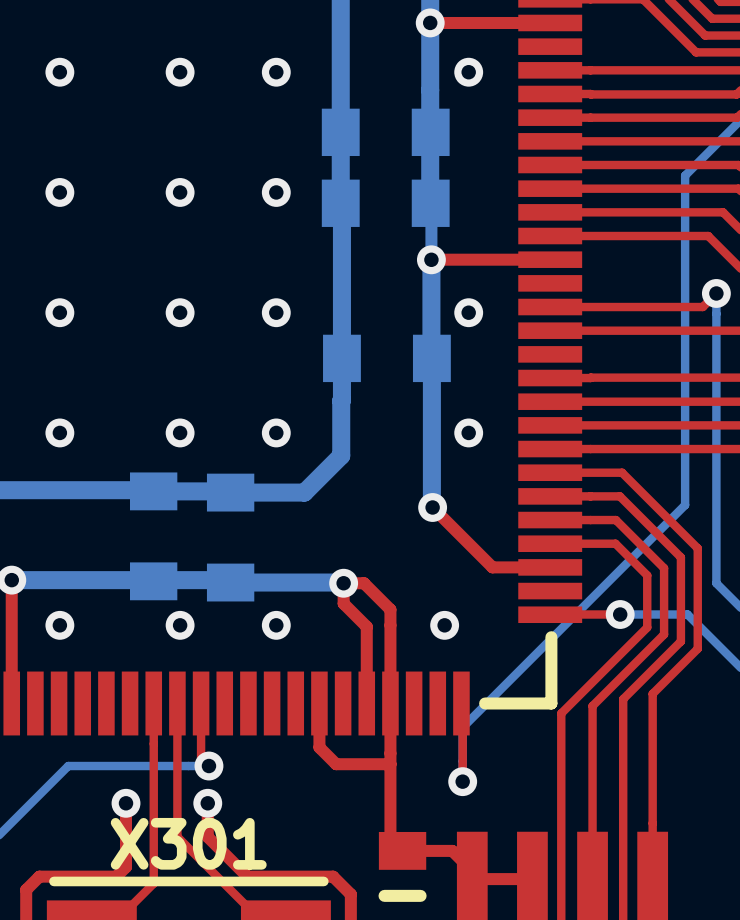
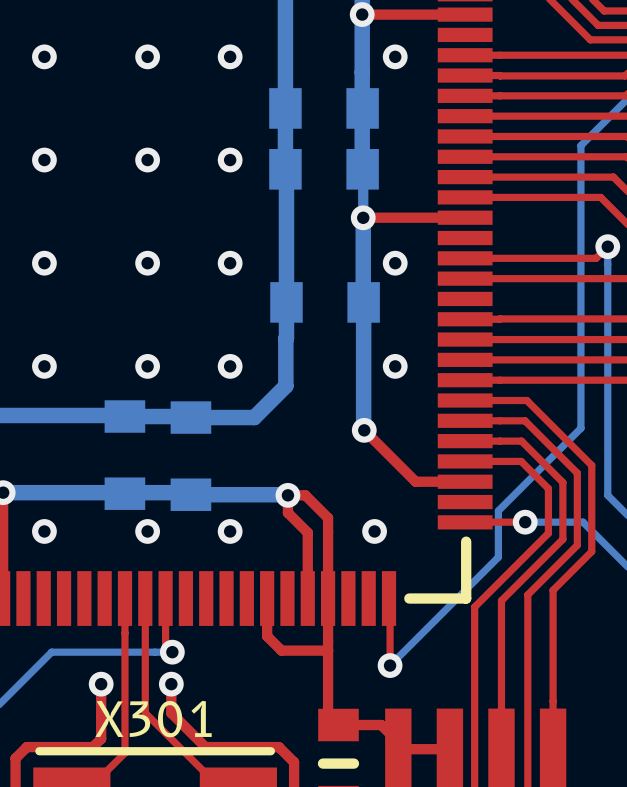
bottom track: (588, 601) (462, 727) (462, 781) -> (498, 510) (498, 557) (390, 665)

